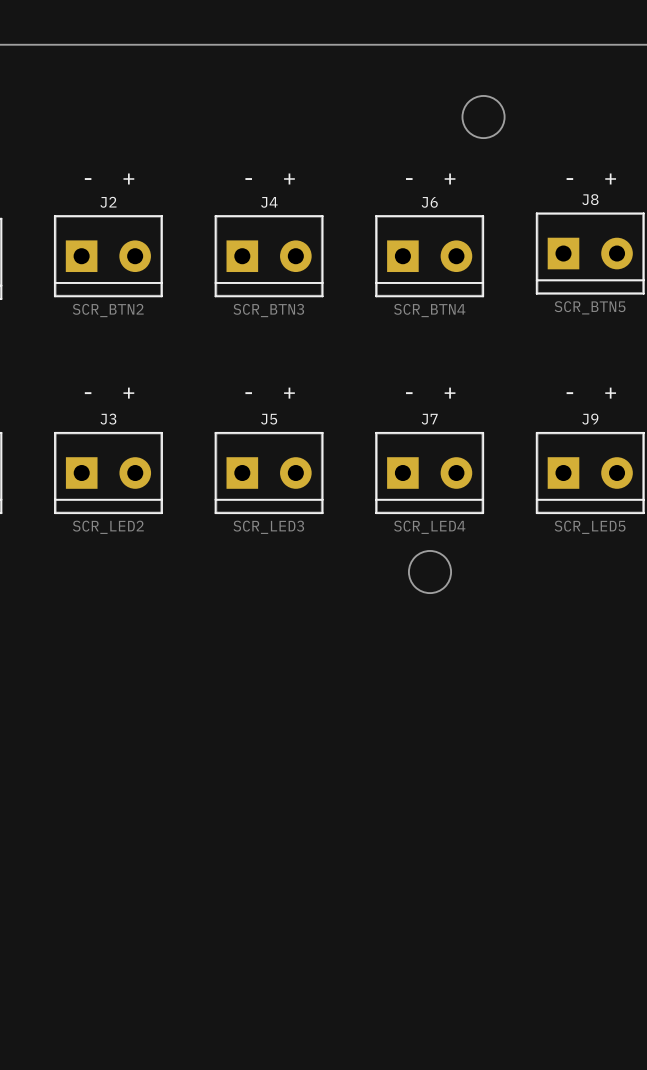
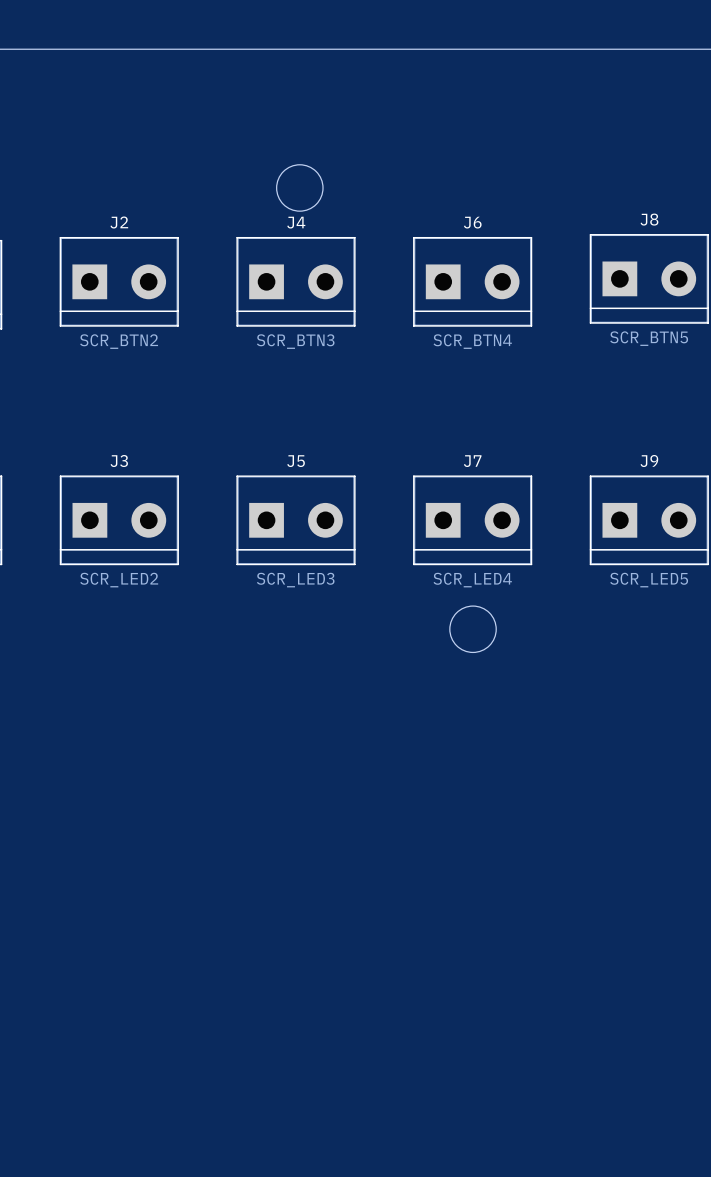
round board edge position: (483, 117) -> (299, 187)
text: - + (109, 178) -> none
text: - + (270, 178) -> none
text: - + (430, 178) -> none
text: - + (591, 178) -> none
text: - + (109, 393) -> none
text: - + (270, 393) -> none
text: - + (430, 393) -> none
text: - + (591, 393) -> none

